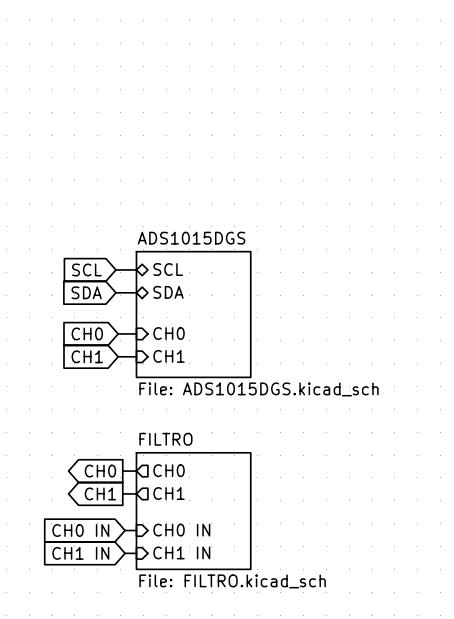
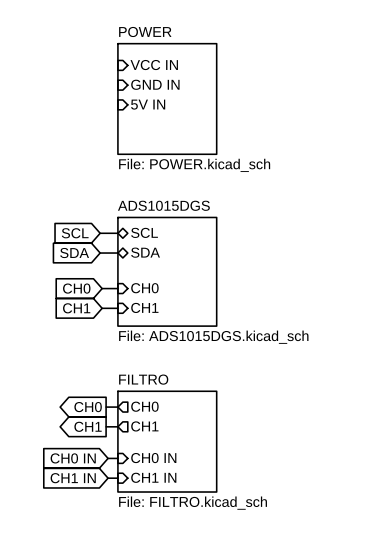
sheet pin: none -> VCC IN (154, 65)
sheet pin: none -> GND IN (155, 84)
sheet POWER: none -> File: POWER.kicad_sch (167, 98)
sheet pin: none -> 5V IN (148, 104)

